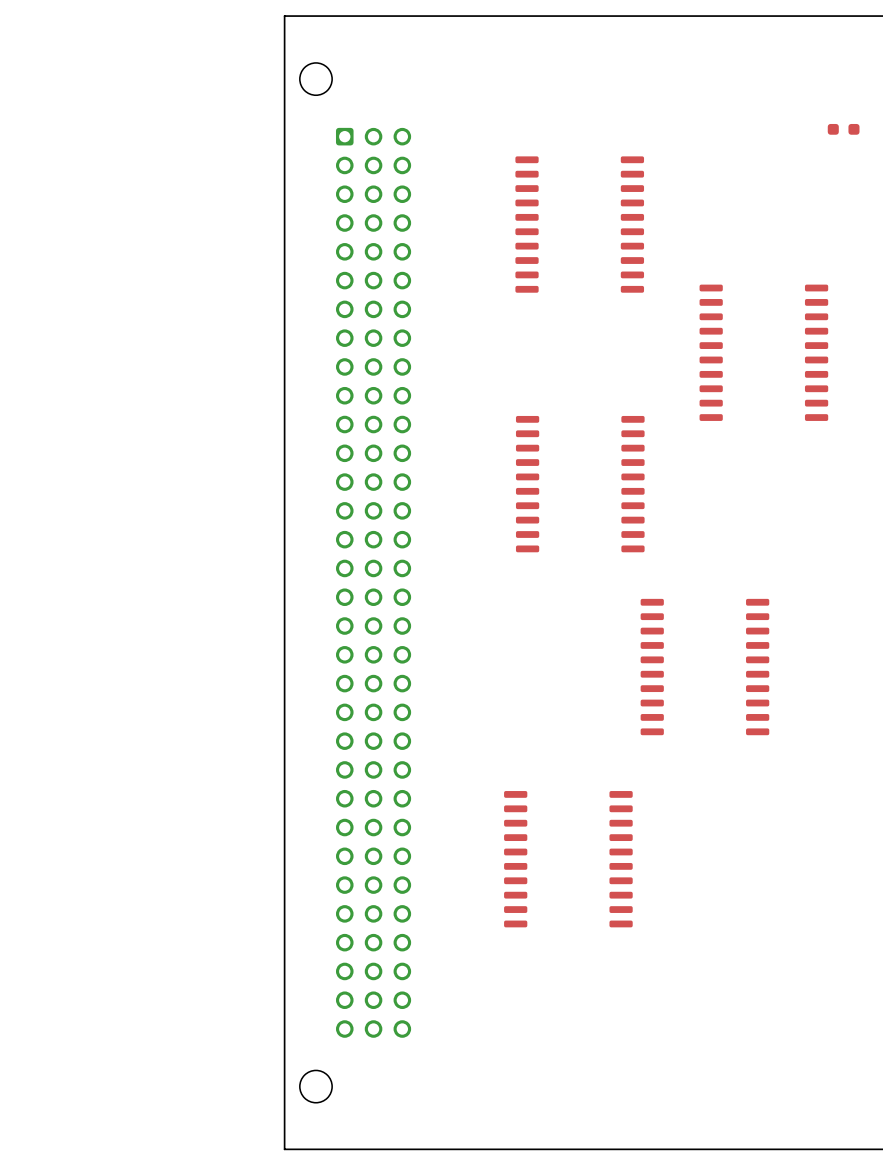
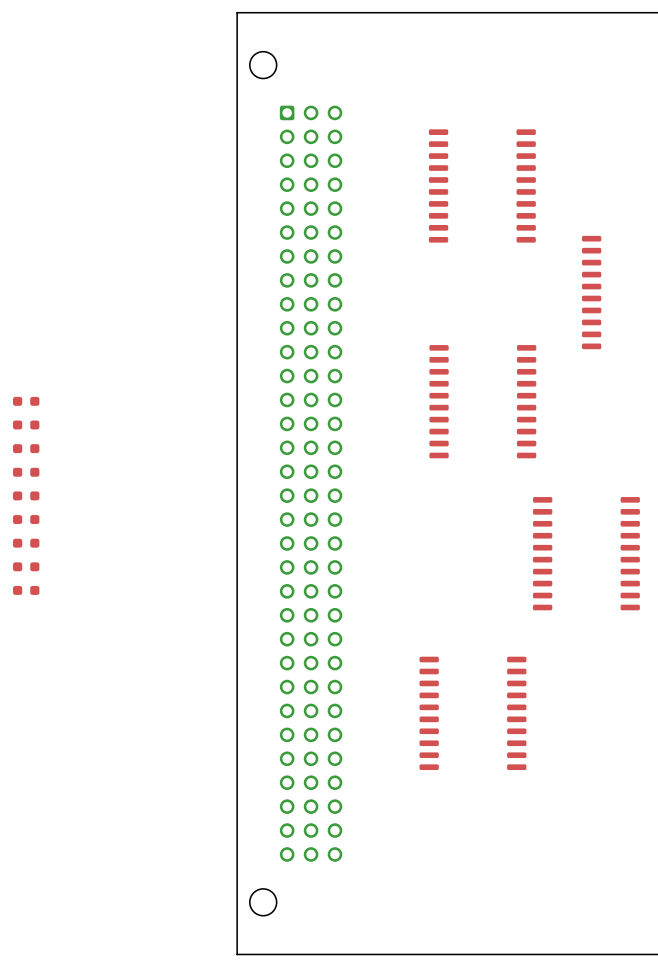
part: none -> (26, 401)
part: none -> (26, 424)
part: none -> (26, 448)
part: none -> (26, 472)
part: none -> (26, 495)
part: none -> (26, 519)
part: none -> (26, 543)
part: none -> (26, 566)
part: none -> (26, 590)

